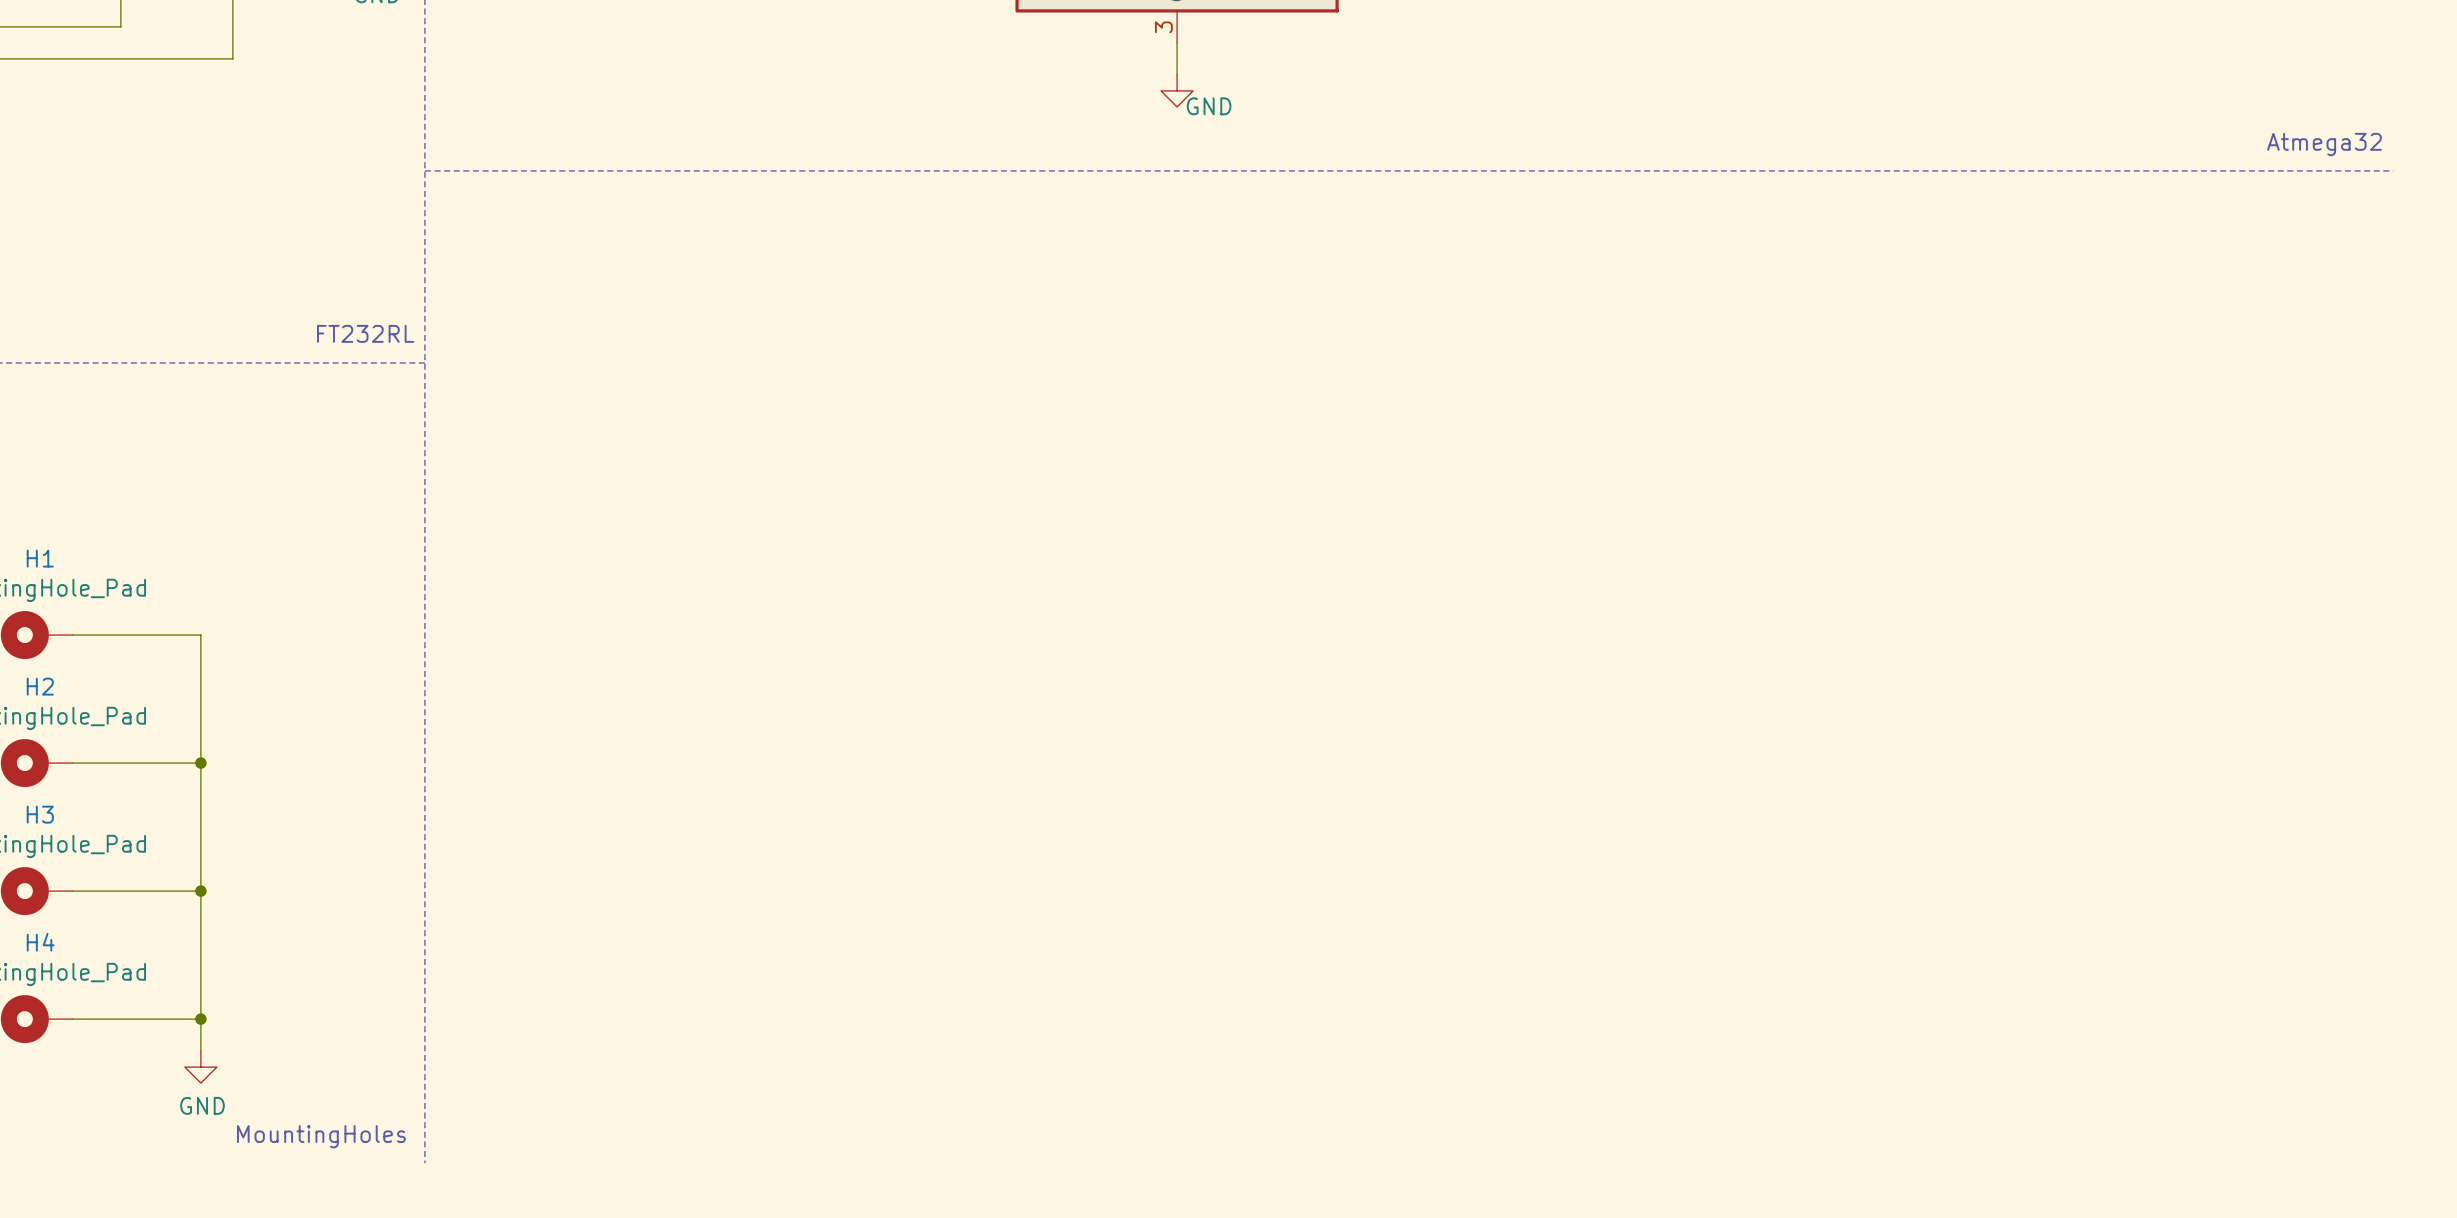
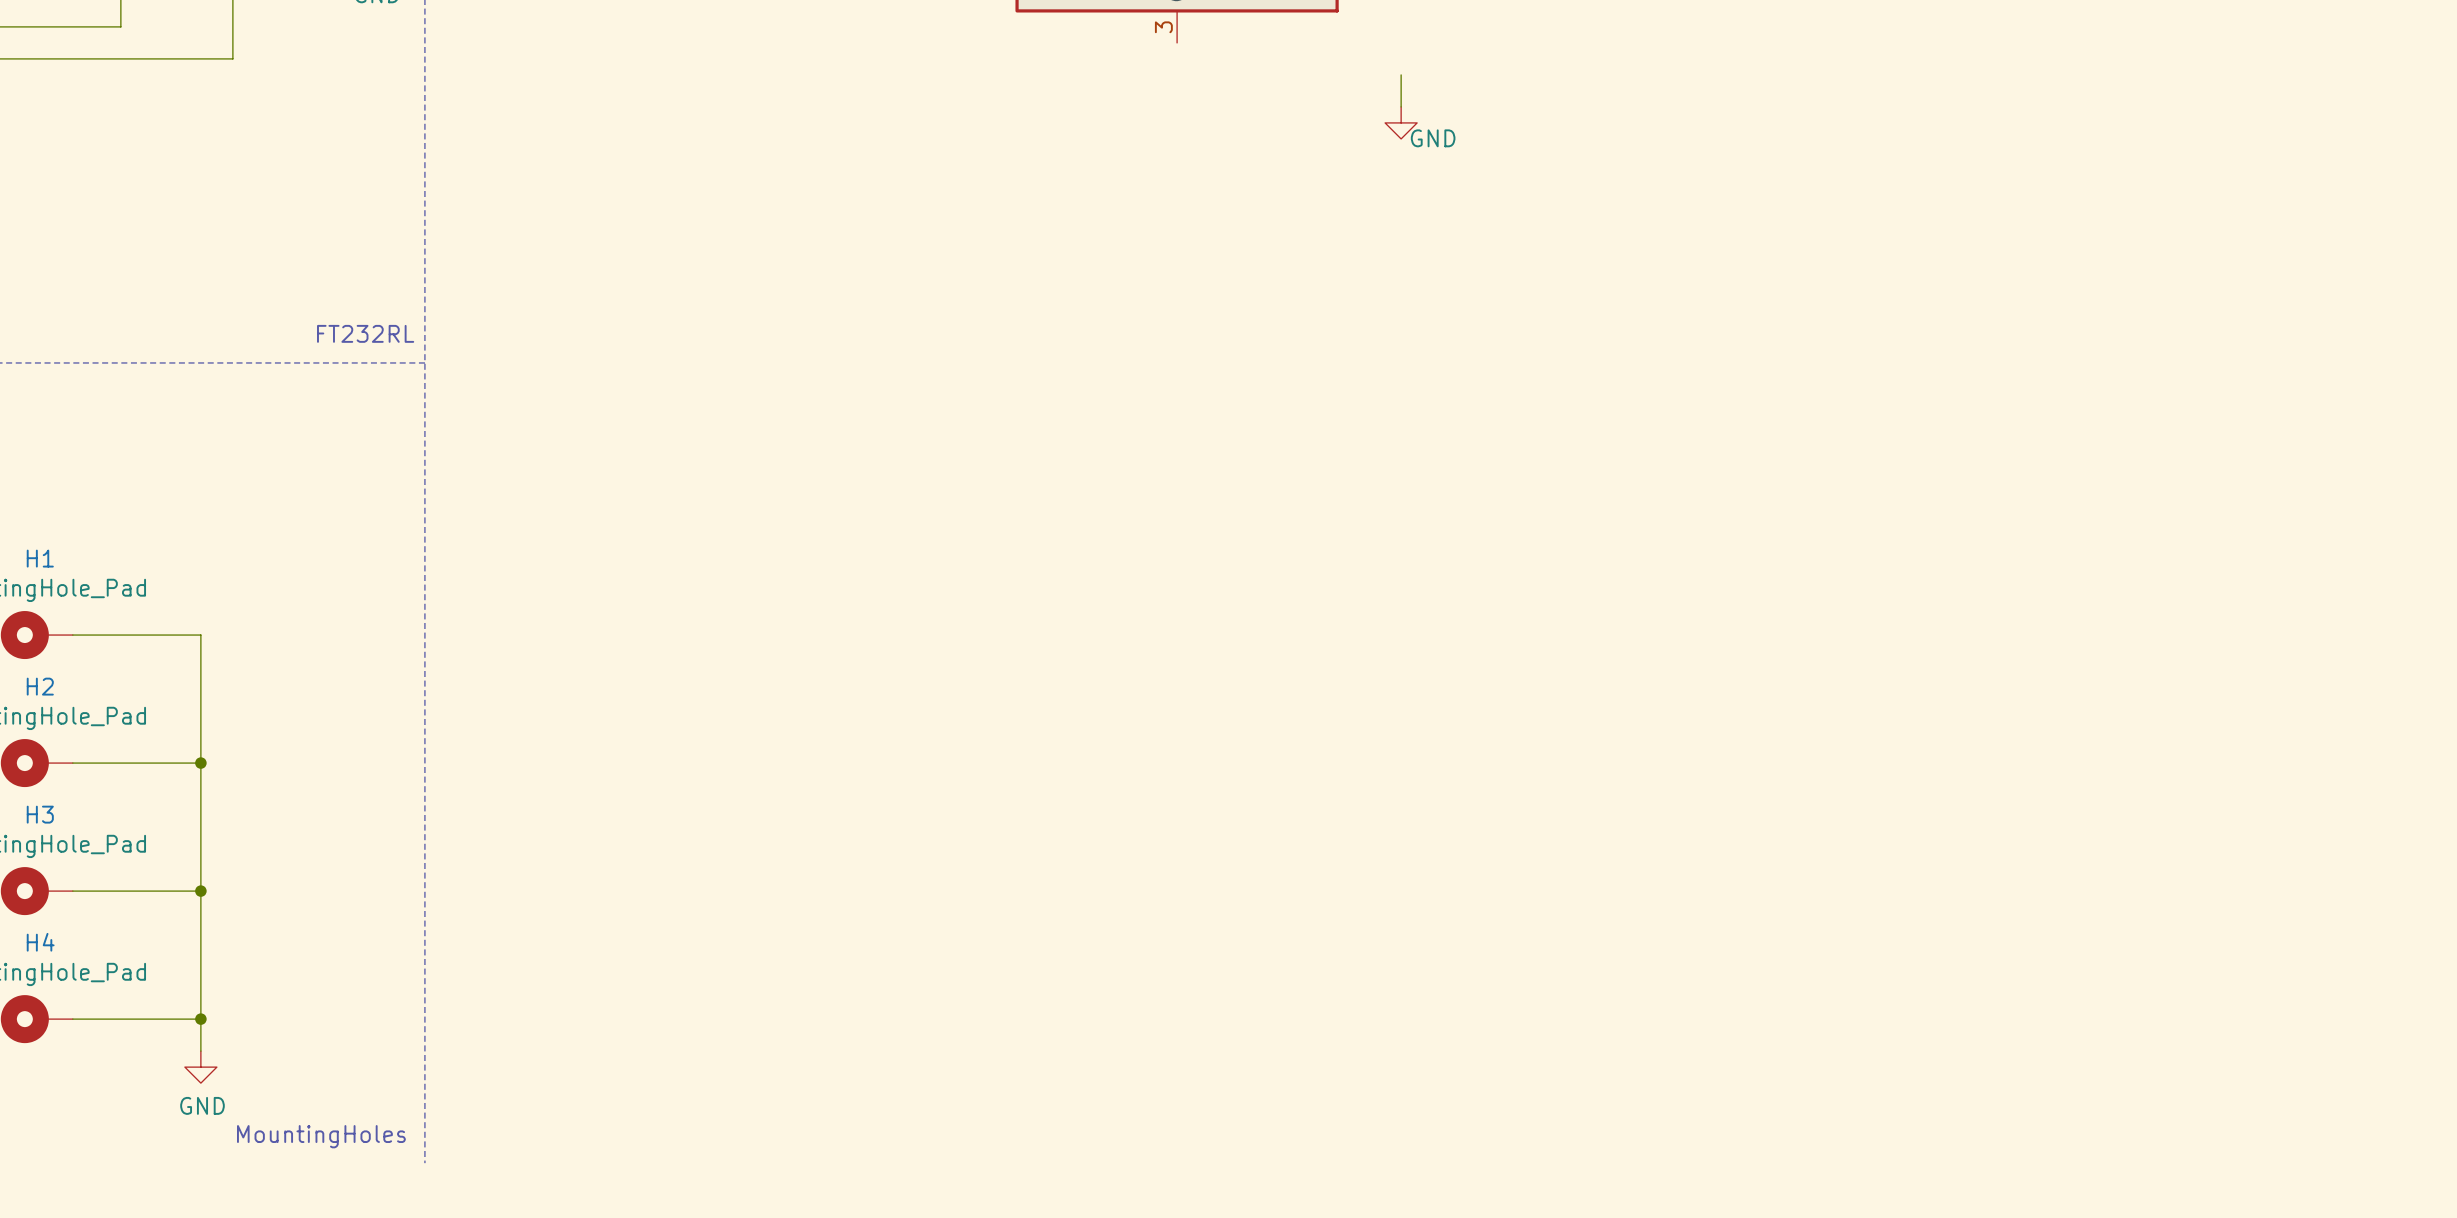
wire: (1177, 42) (1177, 74) -> (1401, 74) (1401, 106)
power symbol position: GND (1177, 90) -> GND (1401, 122)
text: Atmega32 (2324, 144) -> none
line: (424, 170) (2393, 170) -> none

